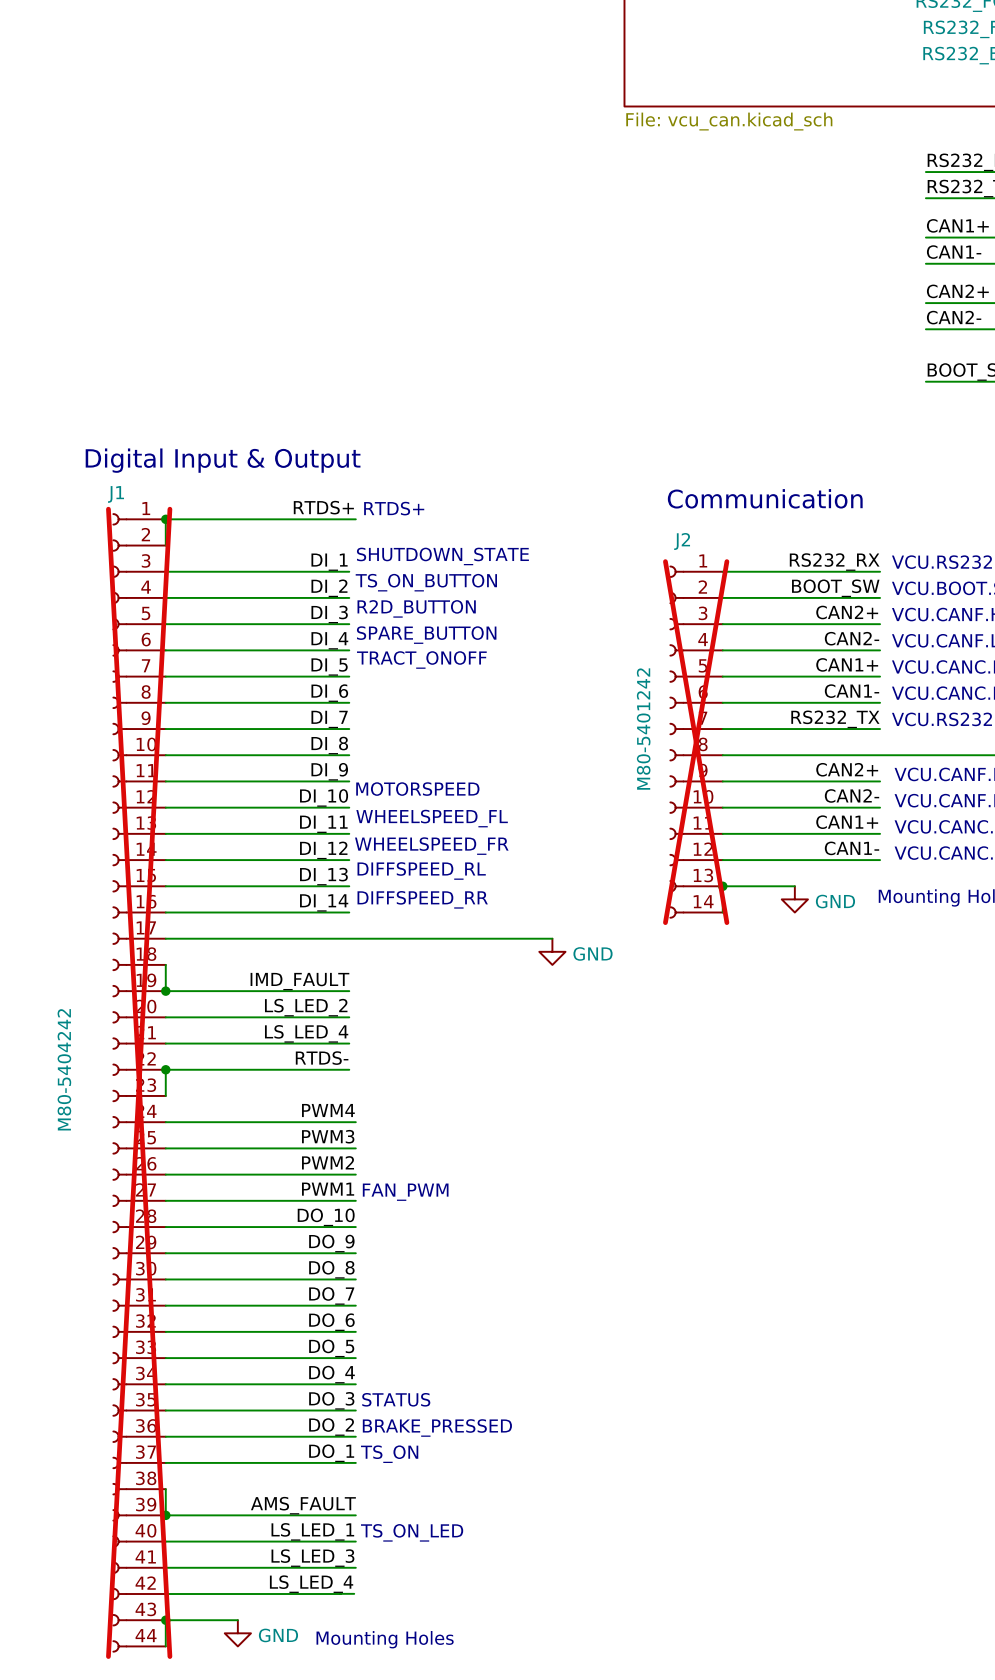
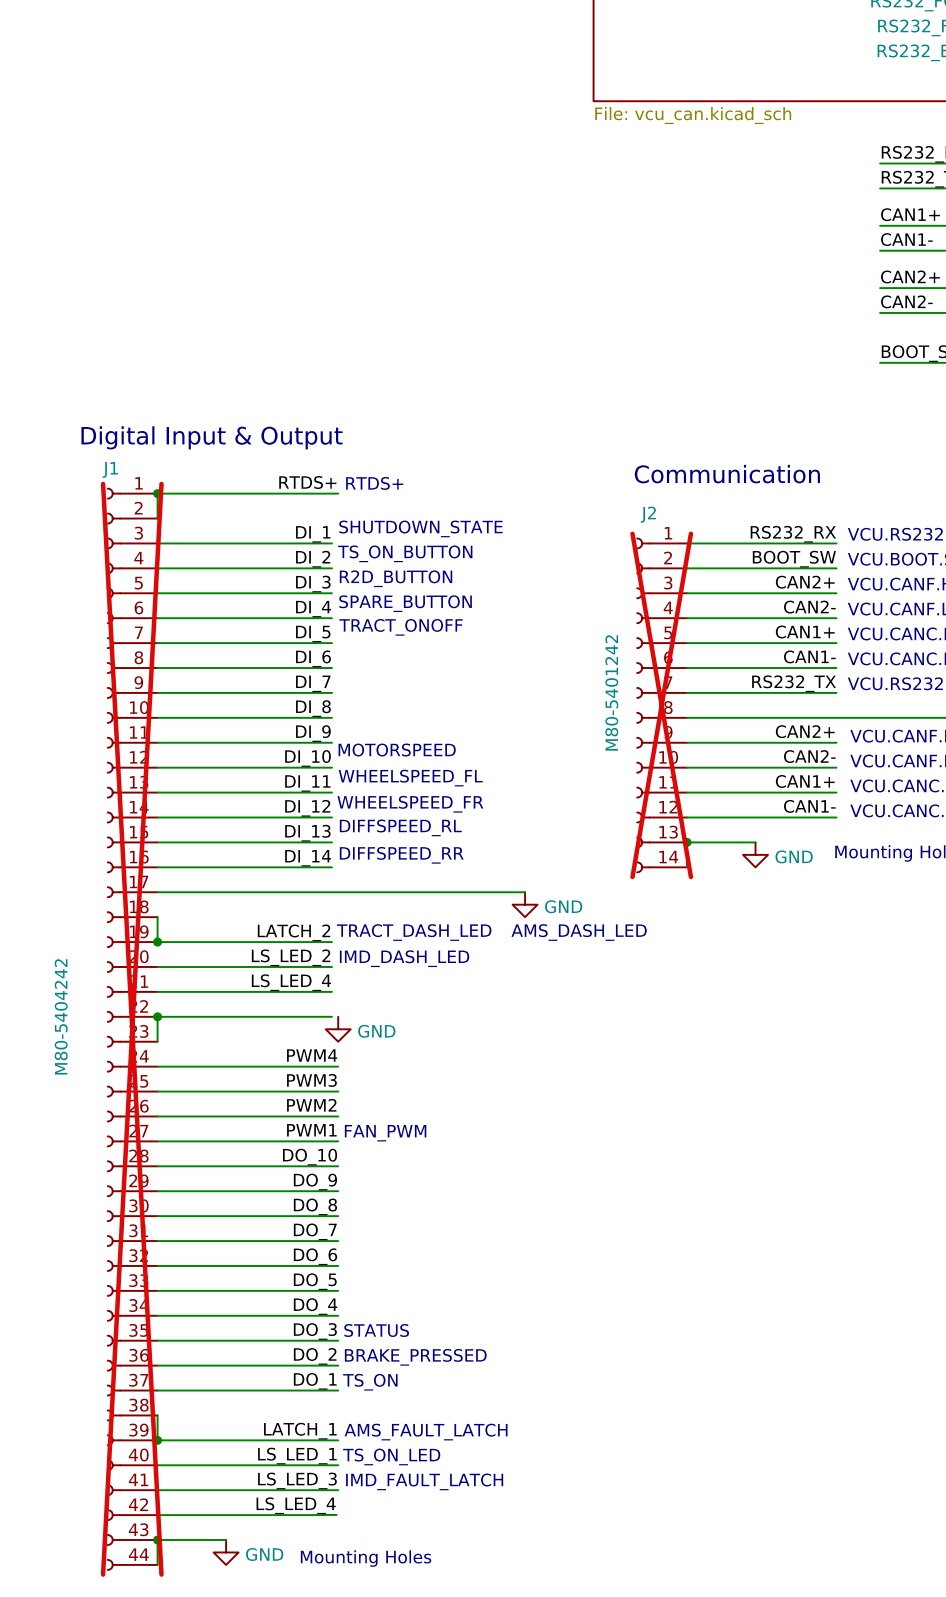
label: IMD_FAULT (299, 981) -> LATCH_2 (294, 932)
text: none -> TRACT_DASH_LED (414, 932)
text: none -> AMS_DASH_LED (579, 932)
text: none -> IMD_DASH_LED (404, 958)
label: RTDS- (322, 1058) -> none
power symbol: none -> GND (338, 1029)
label: AMS_FAULT (303, 1505) -> LATCH_1 (300, 1431)
text: none -> AMS_FAULT_LATCH (426, 1432)
text: none -> IMD_FAULT_LATCH (424, 1481)

